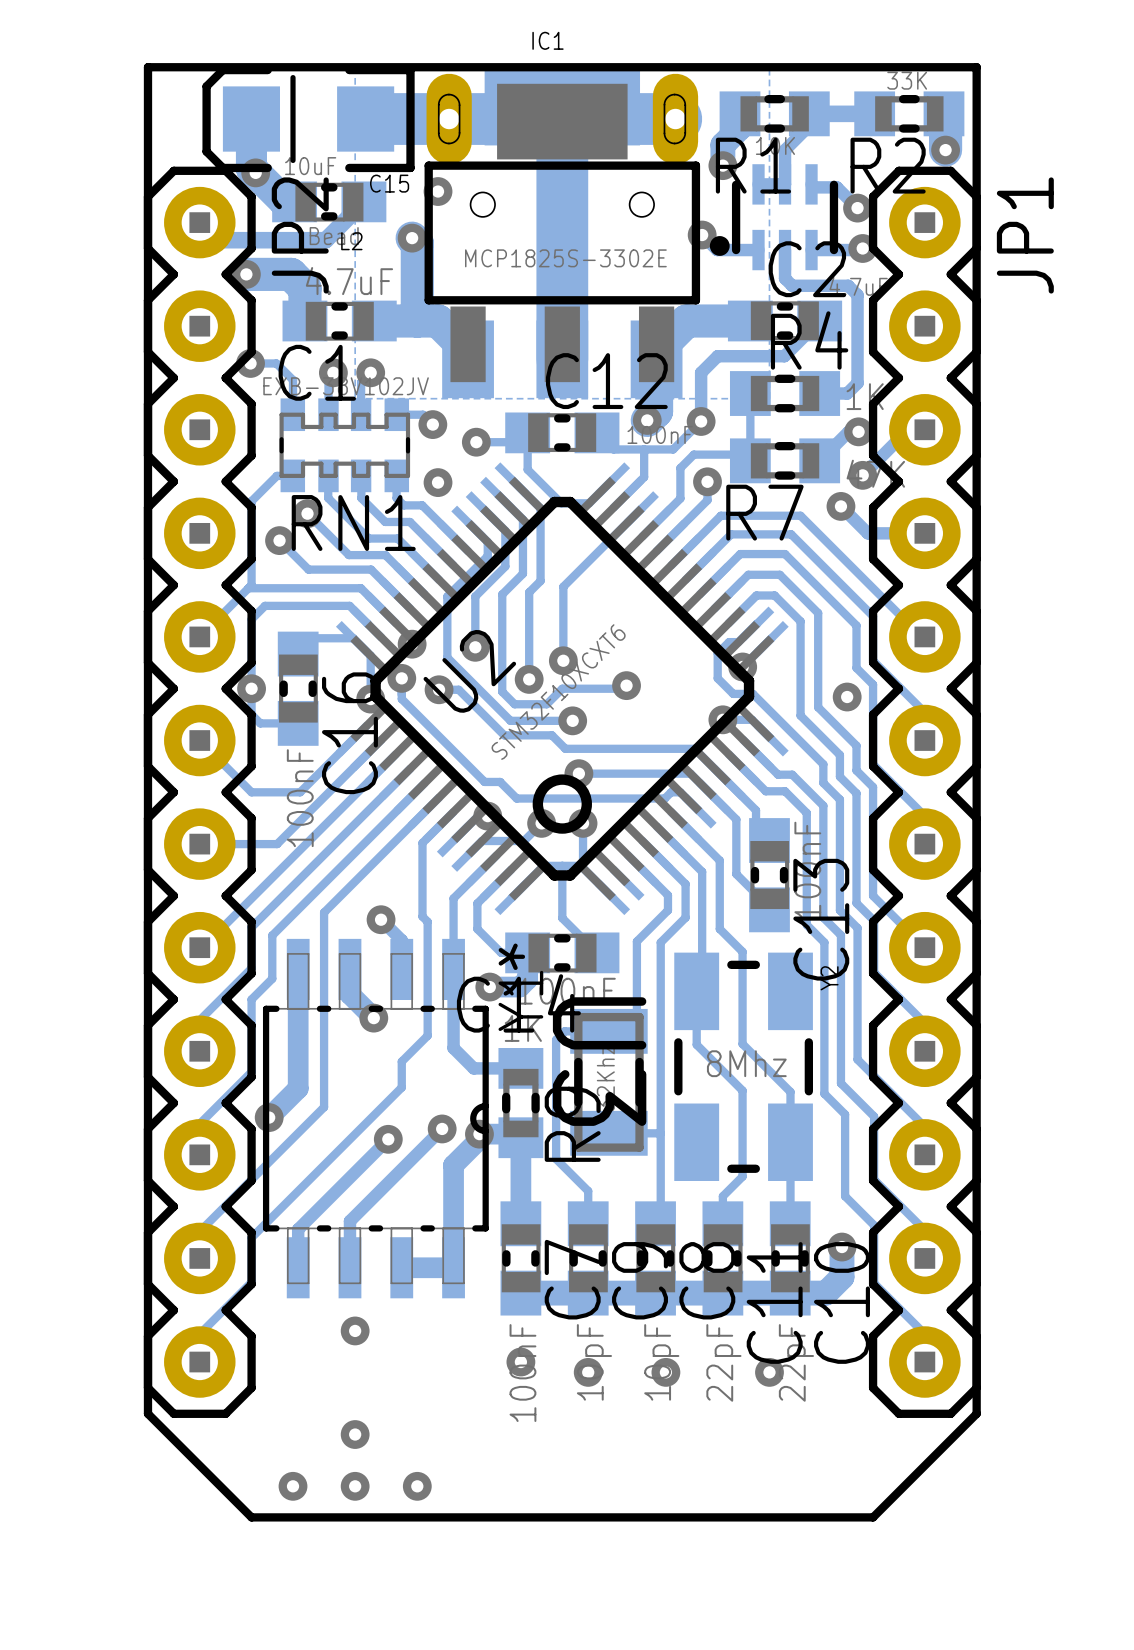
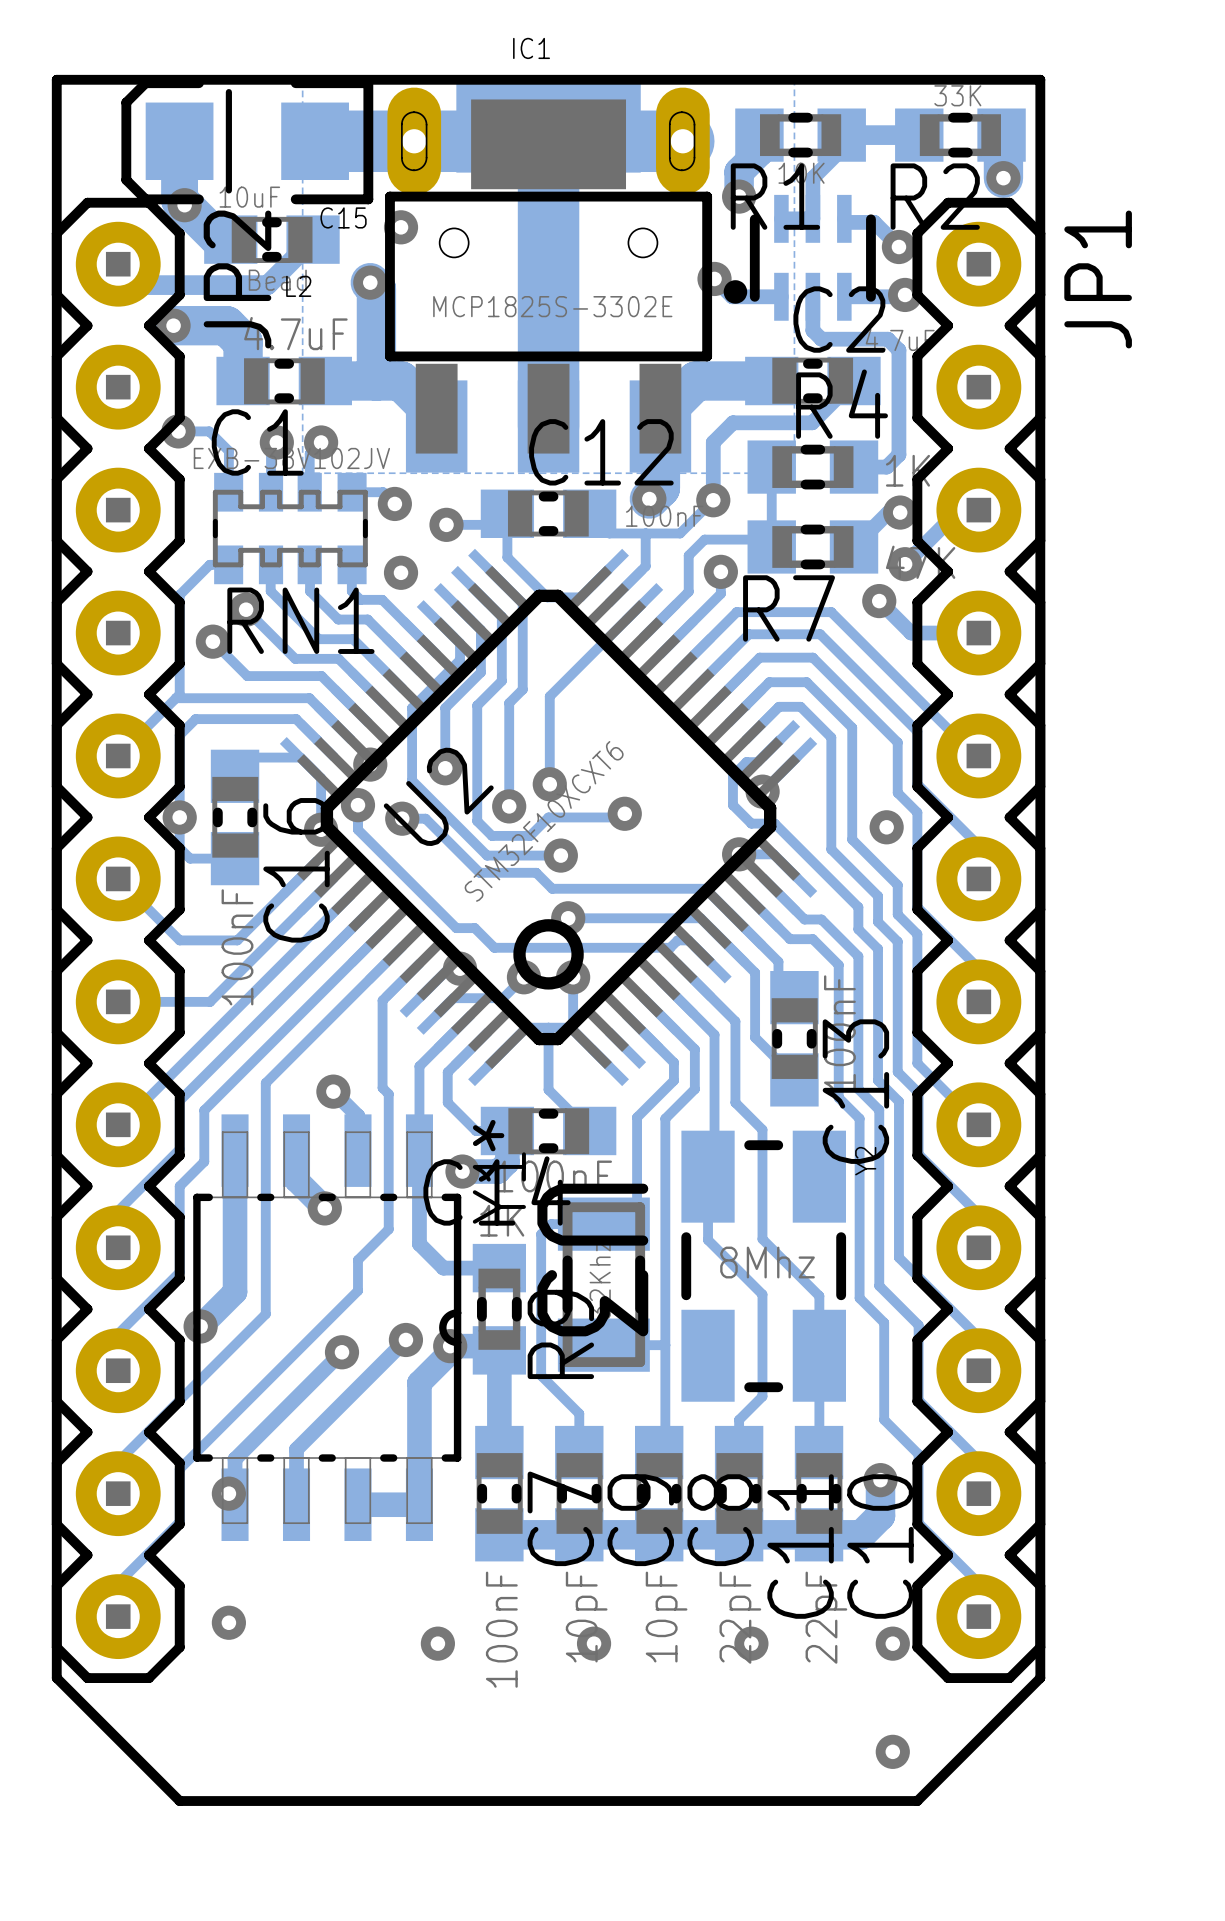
via: none -> (228, 1493)
via: (355, 1330) -> none
via: (520, 1362) -> none
via: none -> (228, 1622)
via position: (588, 1372) -> (594, 1643)
via: (665, 1372) -> none
via: (769, 1372) -> none
via: none -> (437, 1643)
via: none -> (751, 1643)
via: none -> (892, 1643)
via: (355, 1434) -> none
via: none -> (892, 1751)
via: (293, 1486) -> none
via: (355, 1486) -> none
via: (417, 1486) -> none

